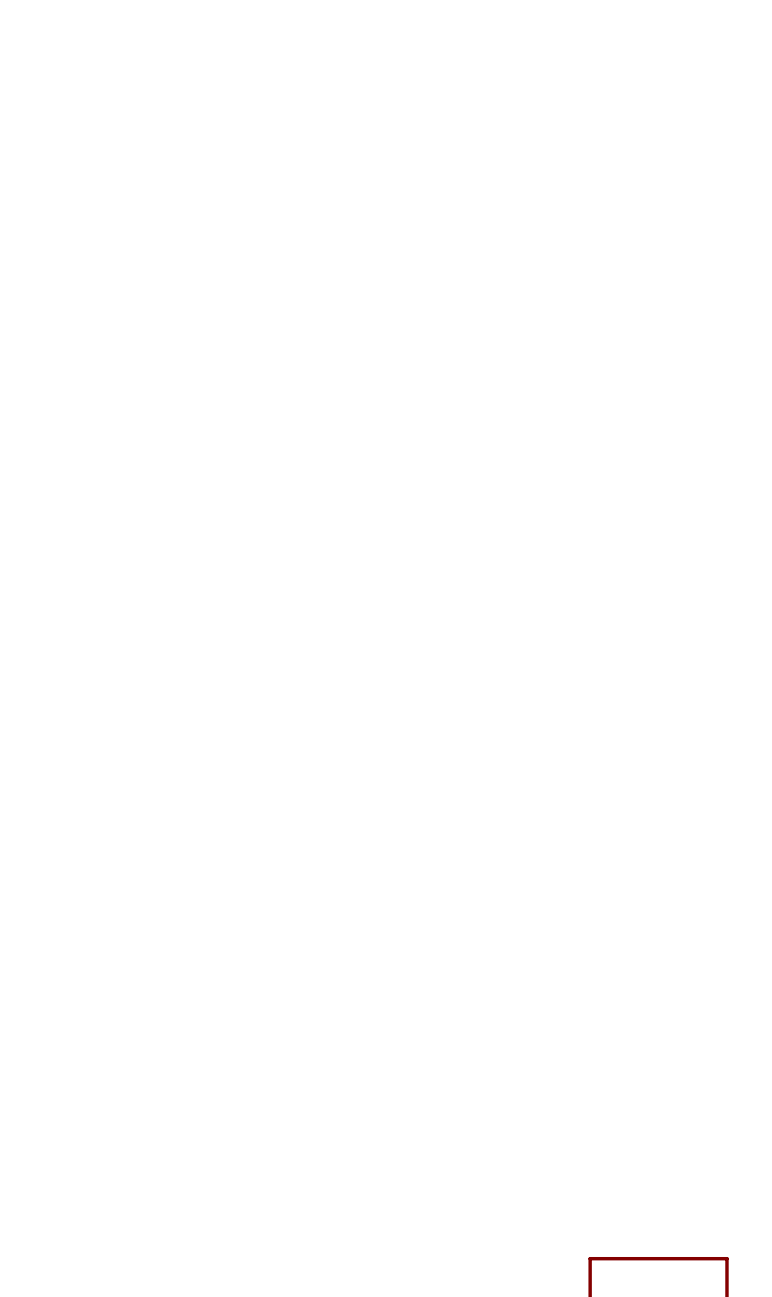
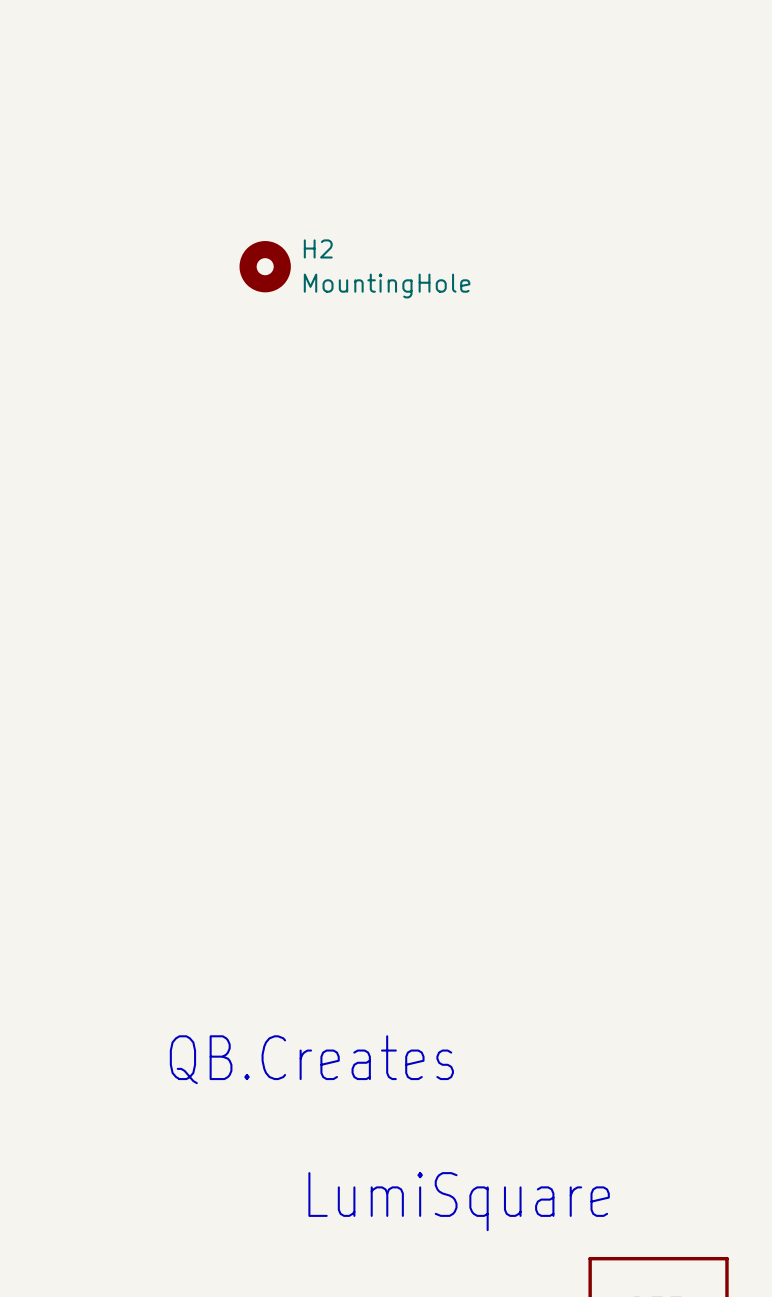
H2: none -> MountingHole (265, 266)
text: none -> QB.Creates (311, 1059)
text: none -> LumiSquare (459, 1201)

